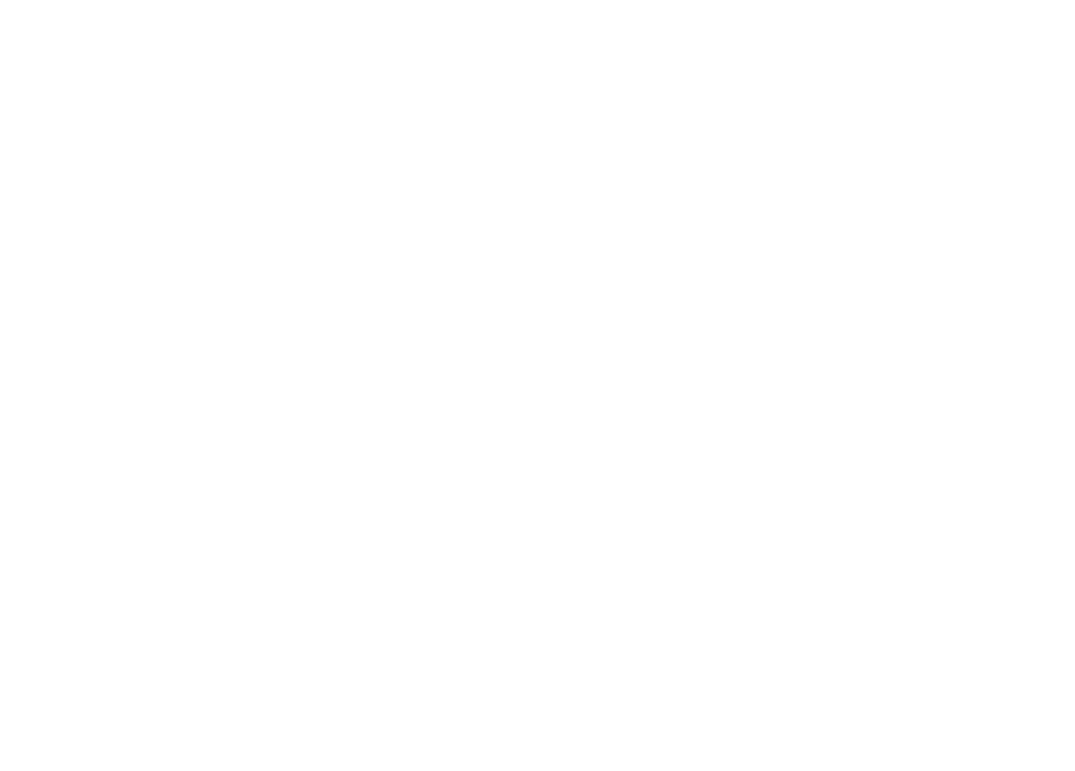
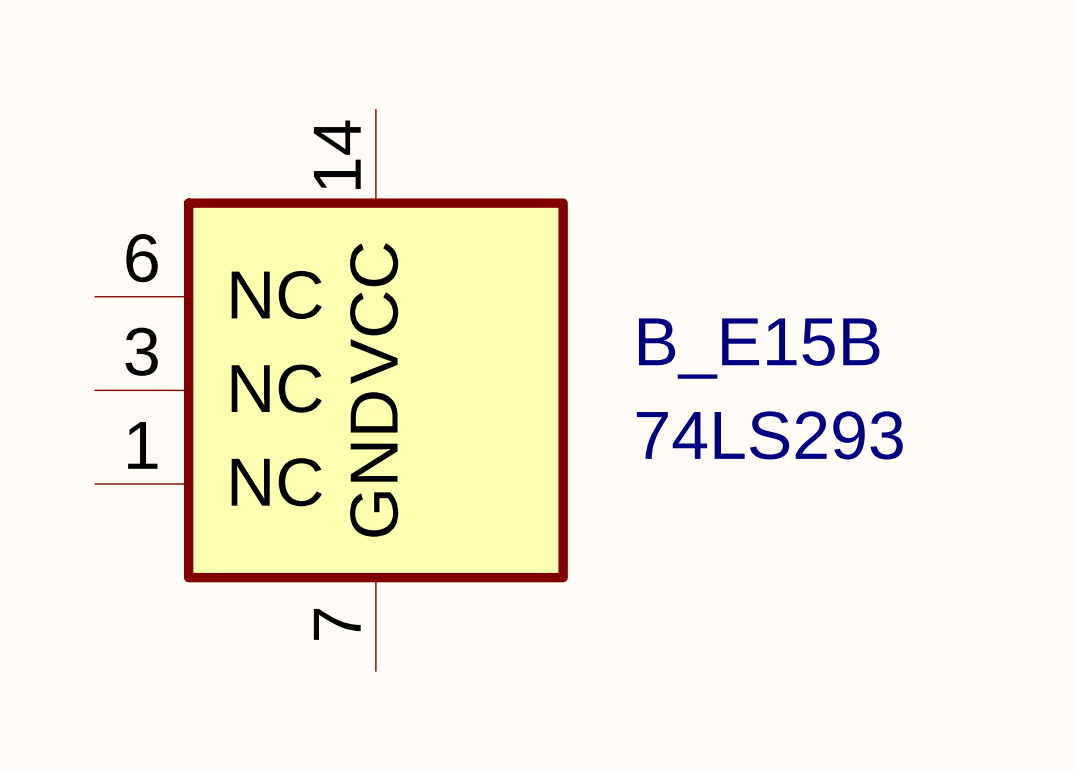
B_E15B: none -> 74LS293 (331, 390)

